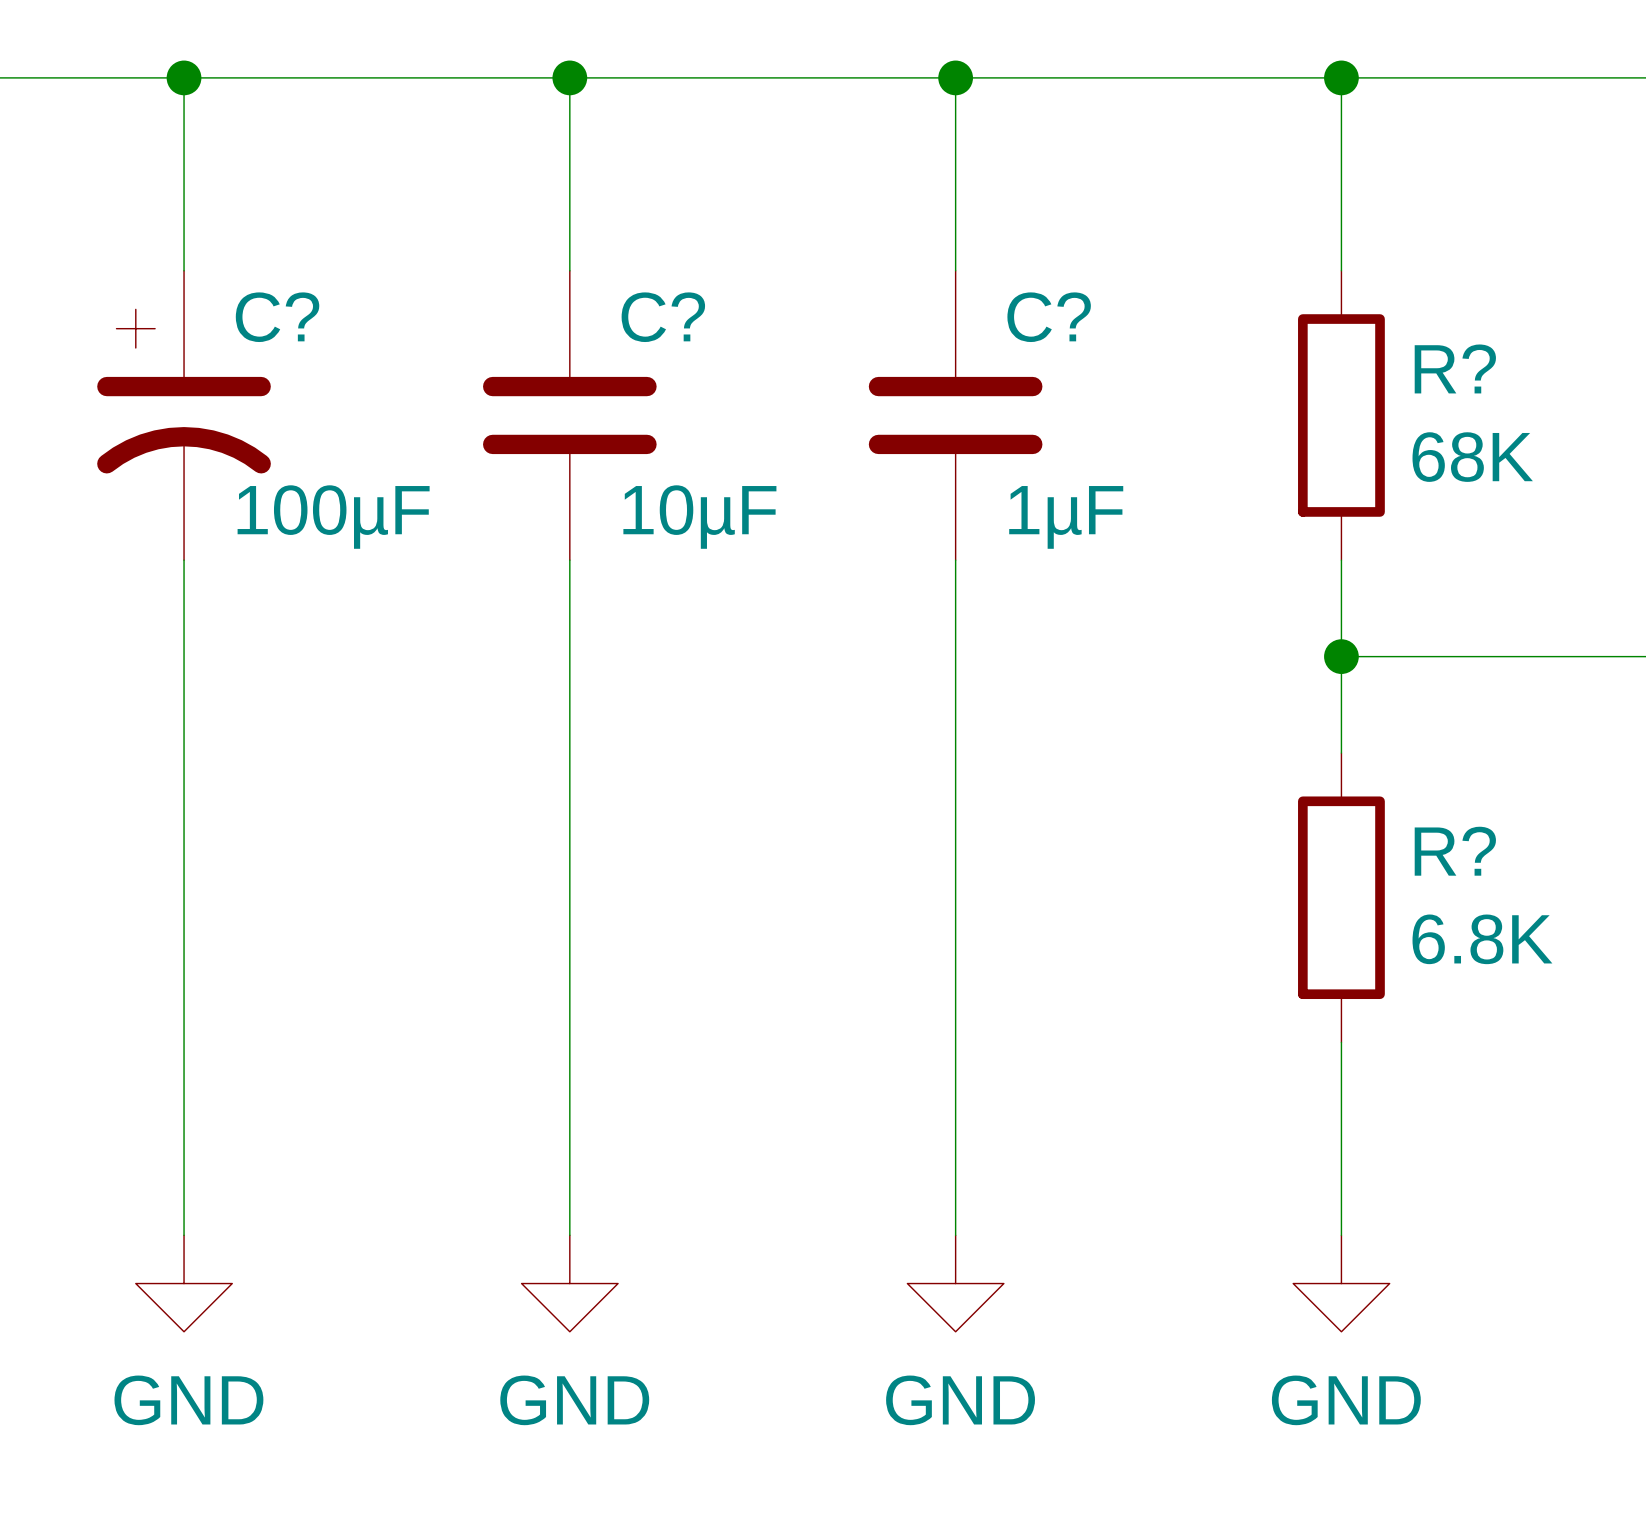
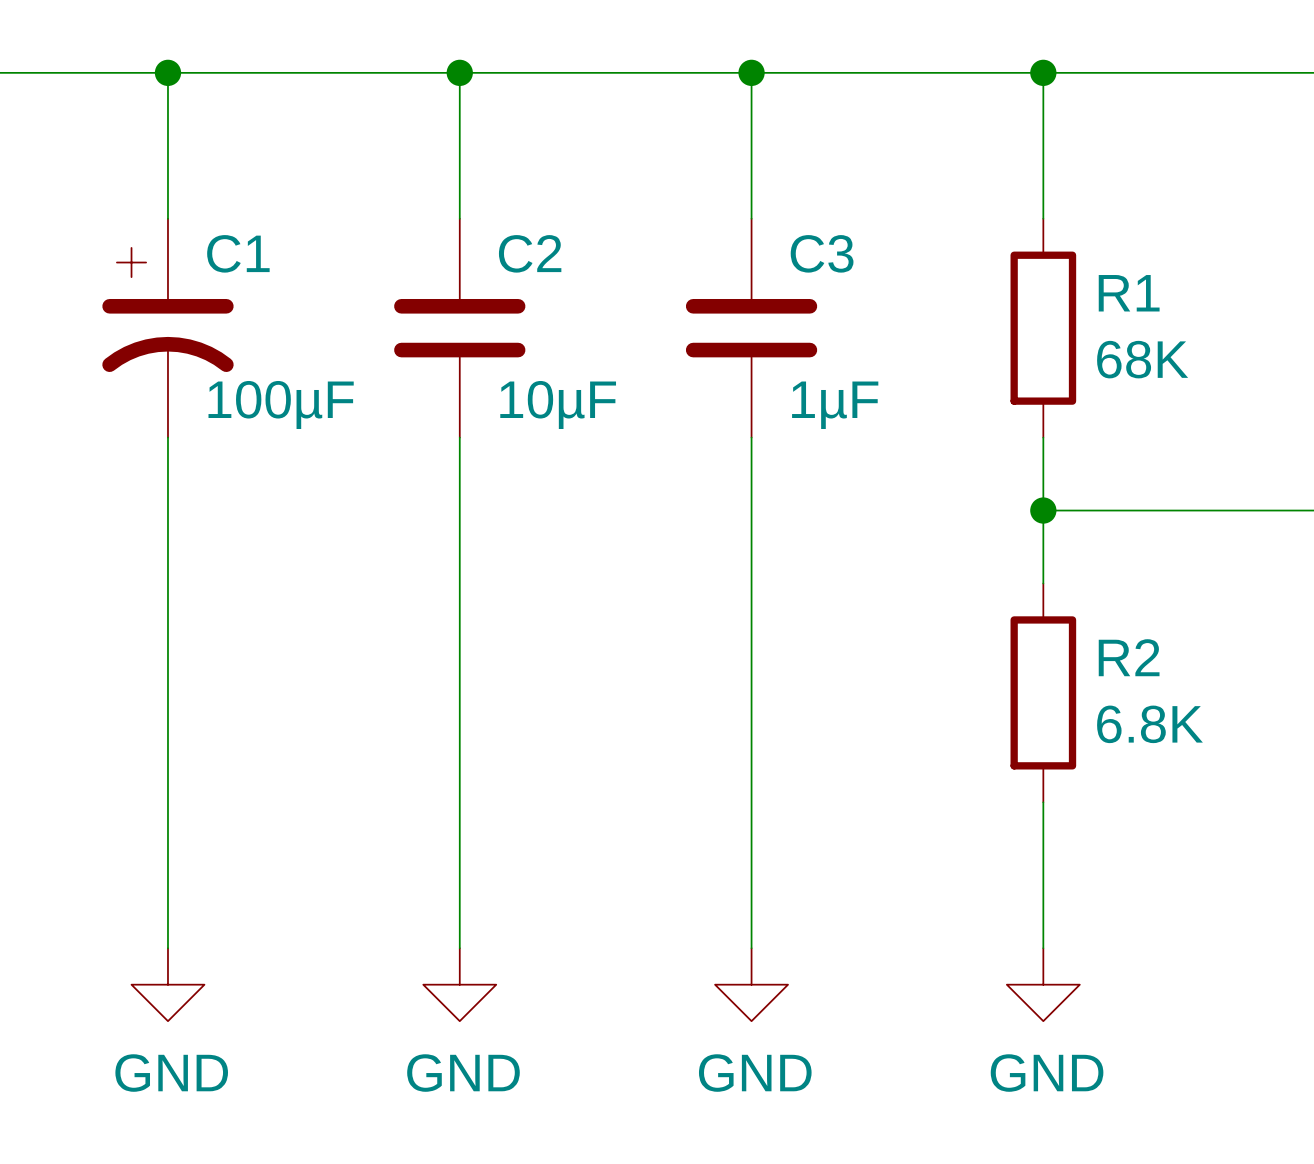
C? name: C? (277, 317) -> C1 (238, 253)
C? name: C? (663, 317) -> C2 (530, 253)
C? name: C? (1049, 317) -> C3 (822, 253)
R? name: R? (1455, 368) -> R1 (1129, 293)
R? name: R? (1455, 851) -> R2 (1129, 657)

